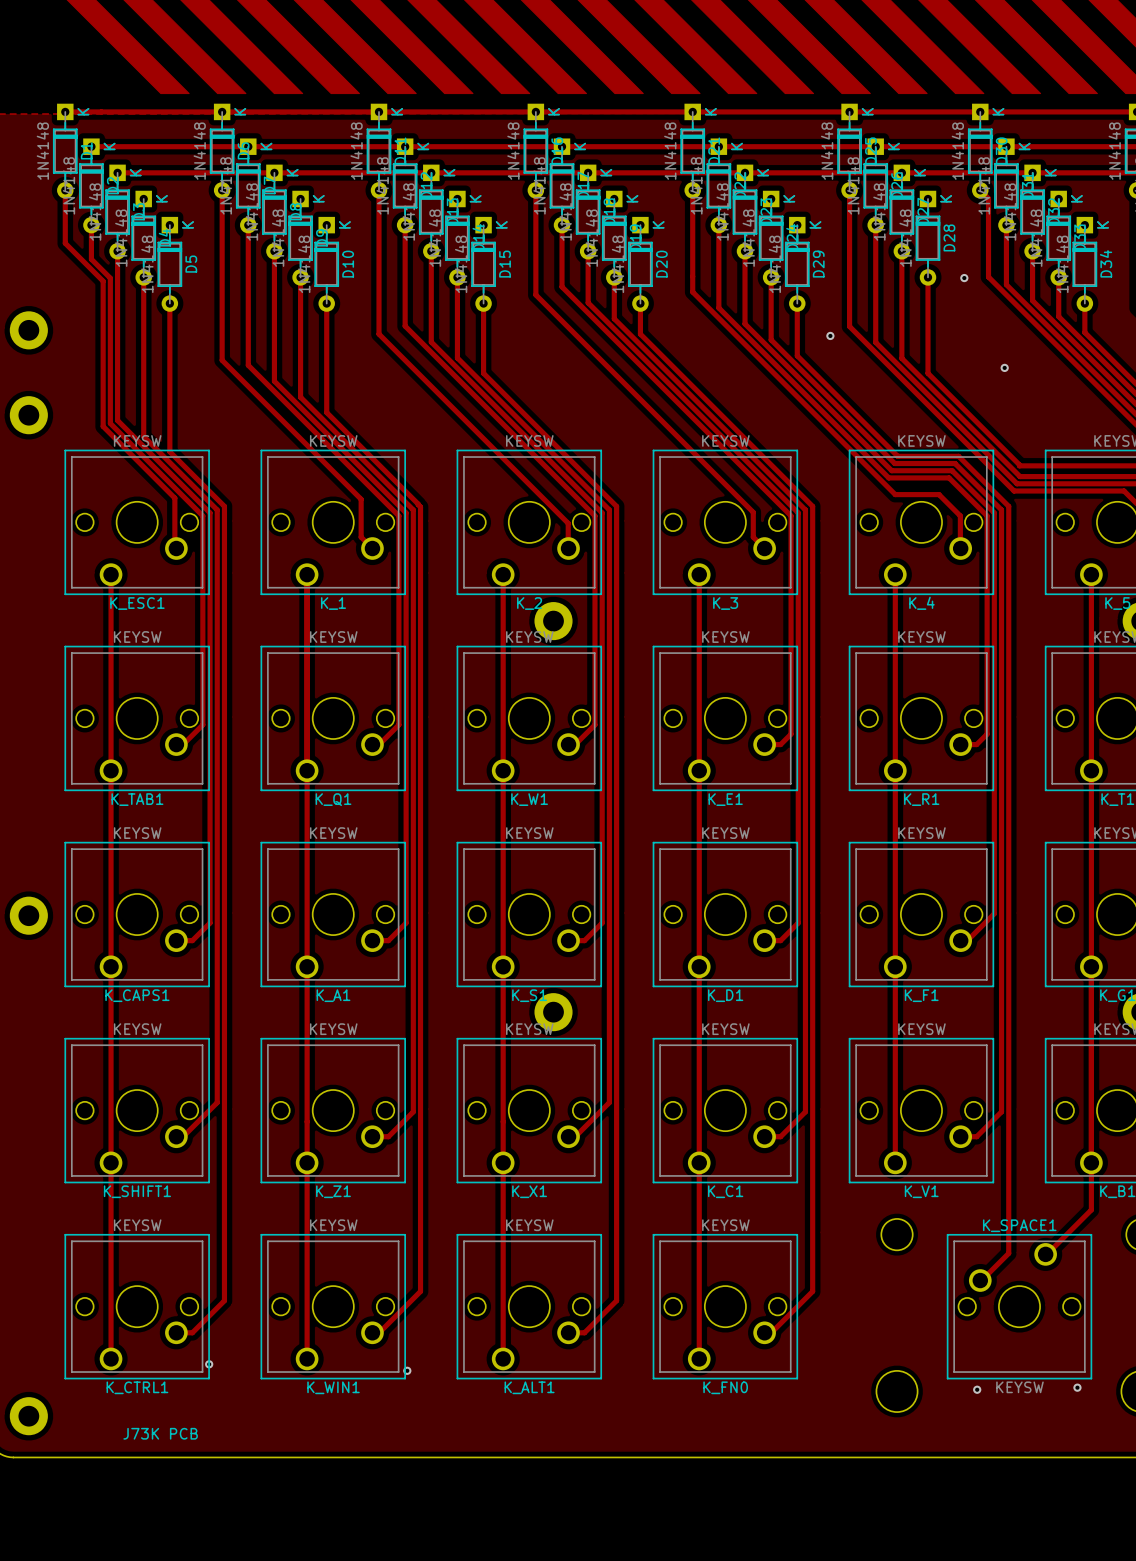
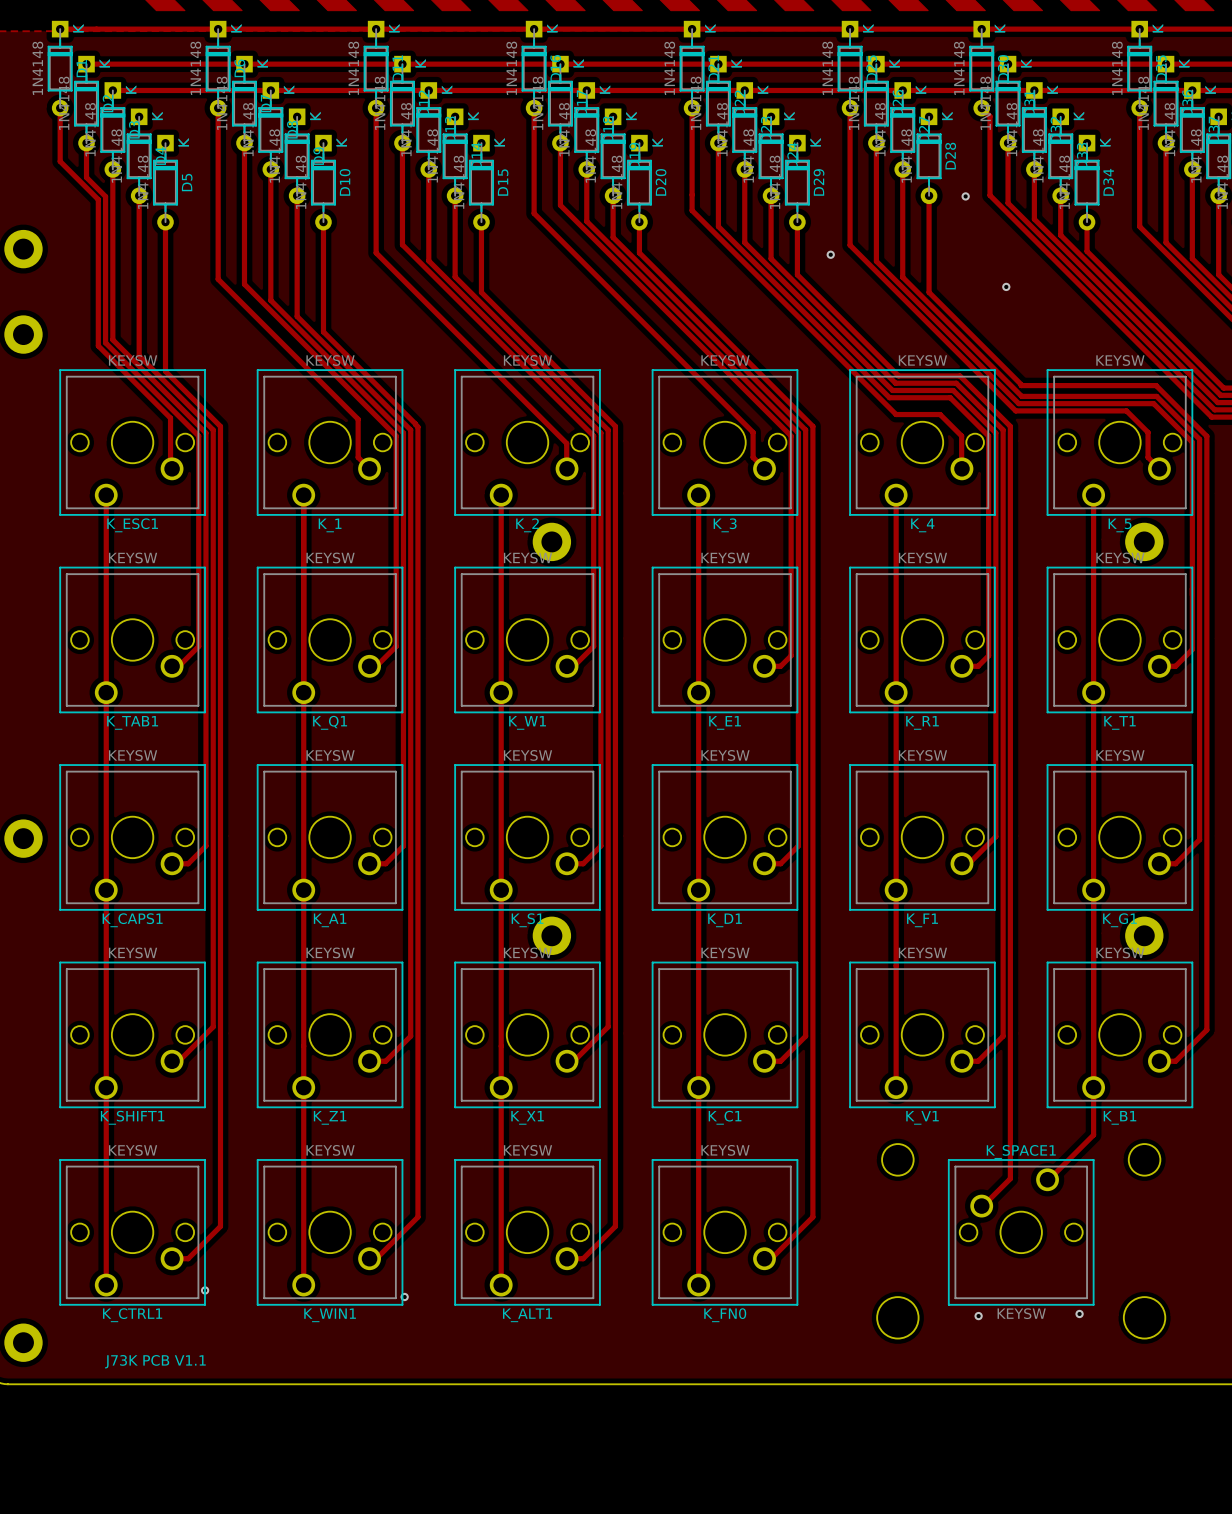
text: J73K PCB (160, 1433) -> J73K PCB V1.1 (155, 1361)

